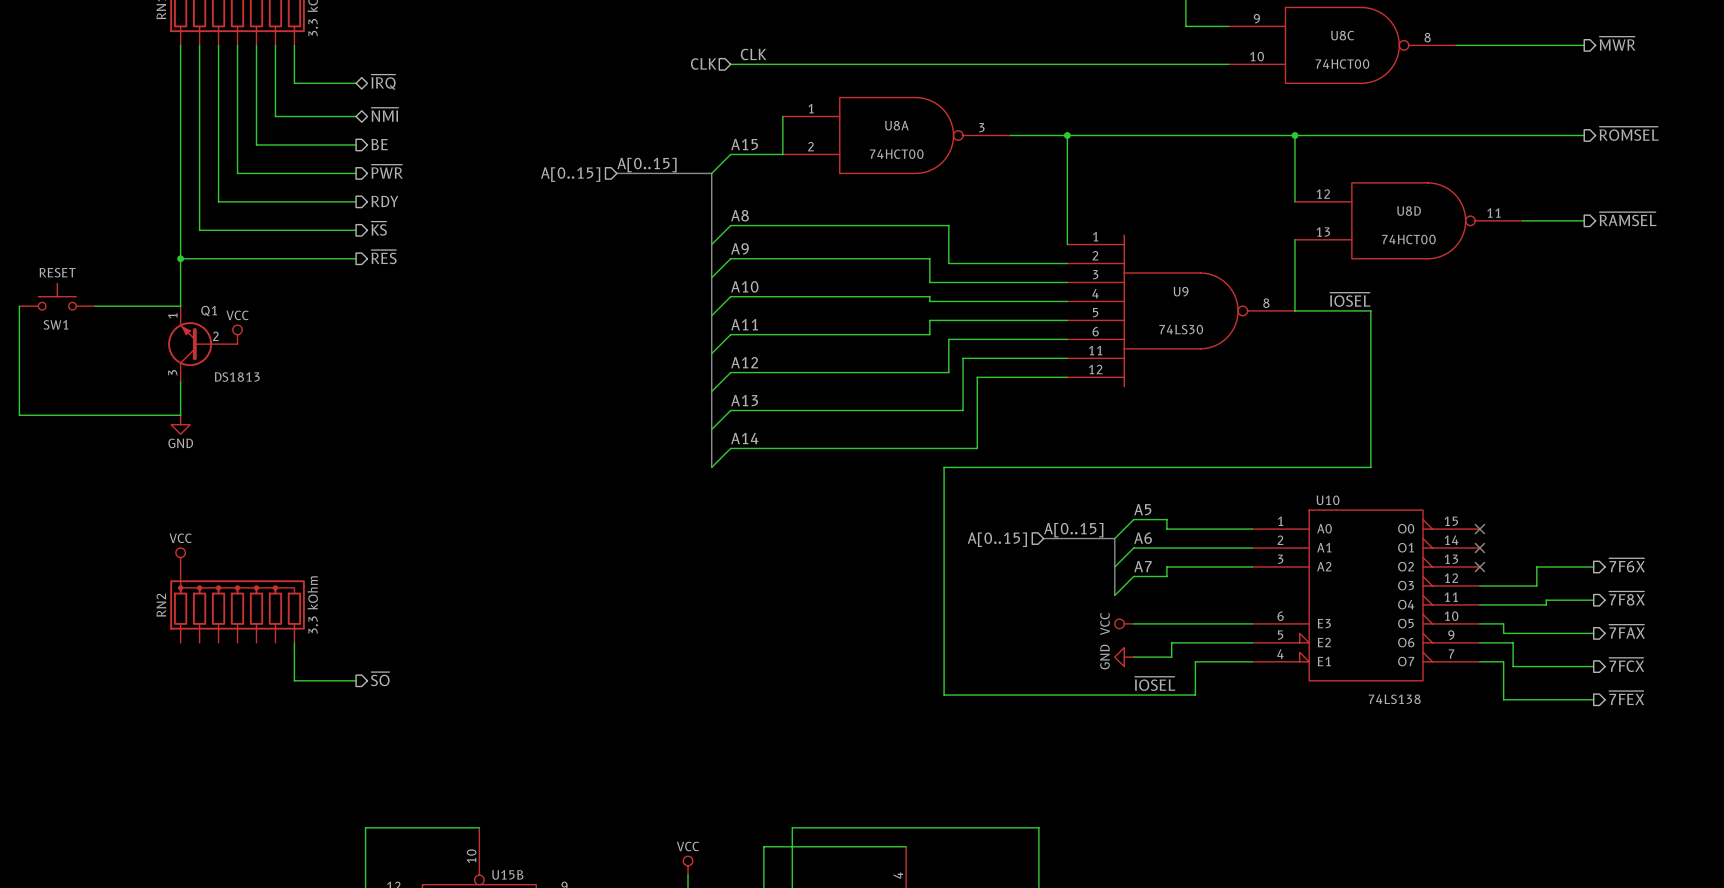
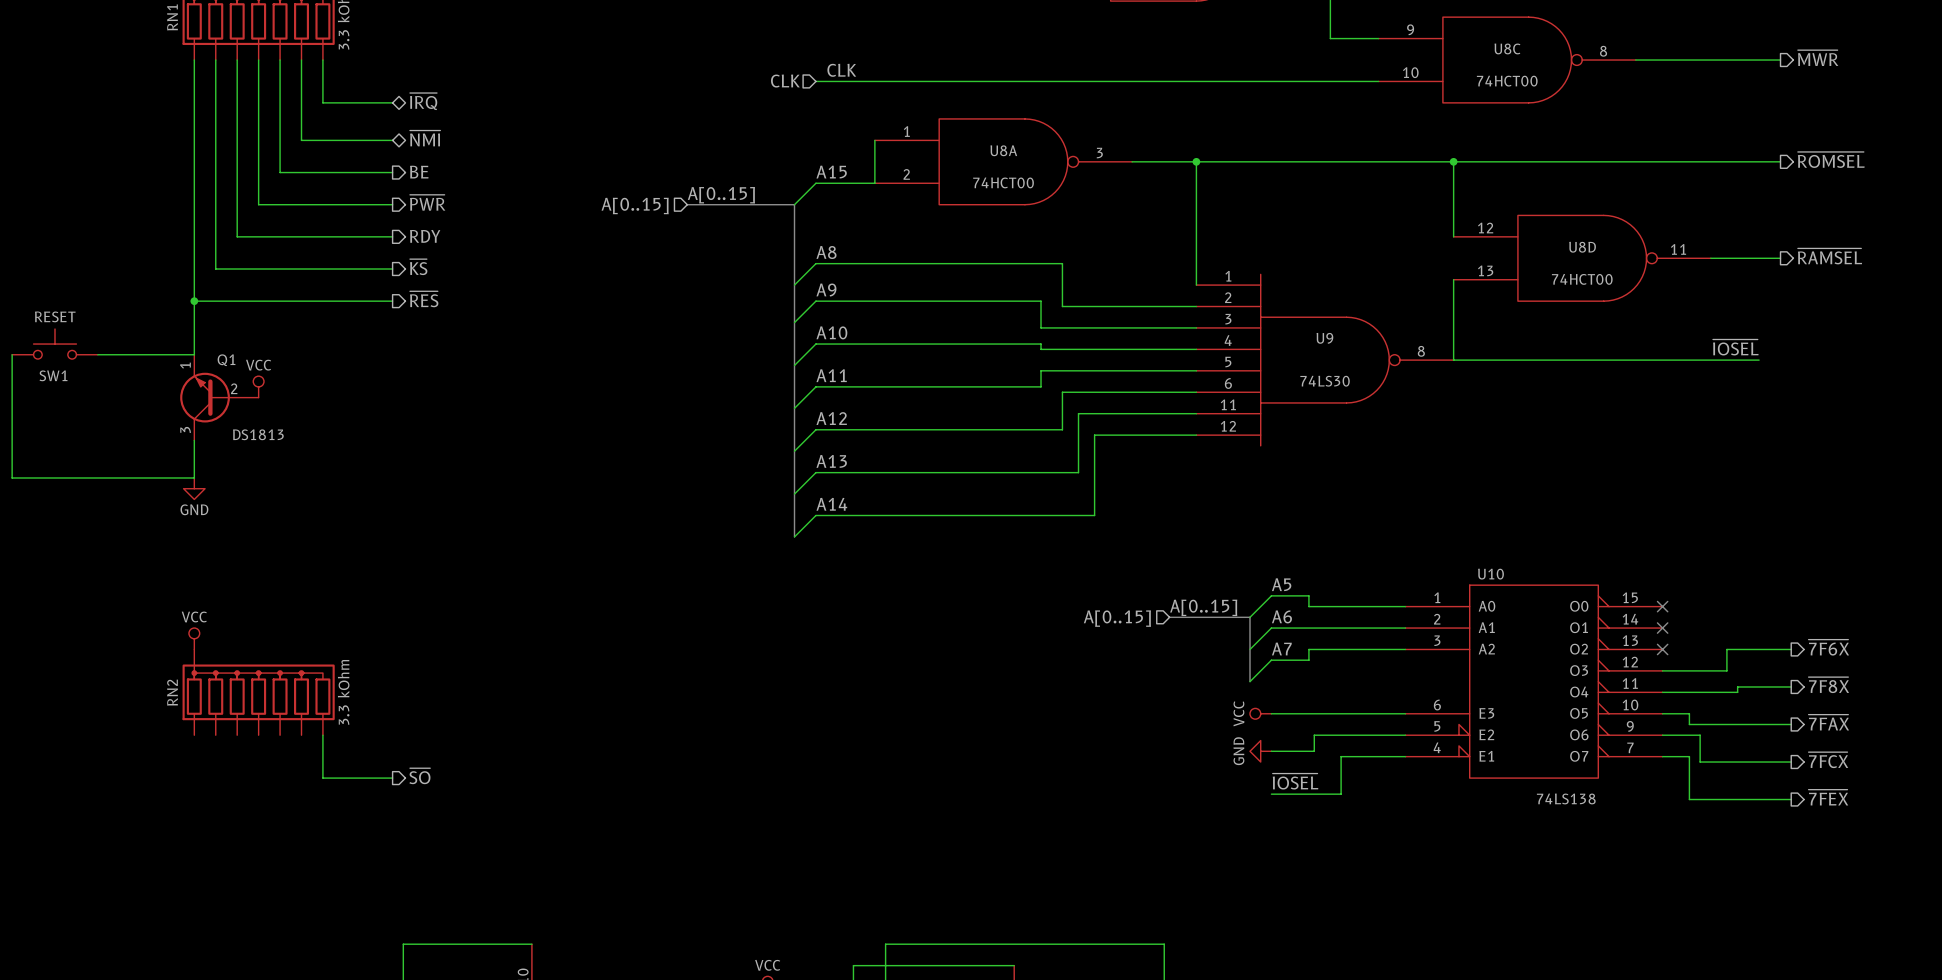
label: ~{IOSEL} (1350, 299) -> none
label: none -> ~{IOSEL} (1735, 347)
wire: (1370, 310) (1370, 467) (944, 467) (944, 695) (1133, 695) -> (1539, 360) (1759, 360)

